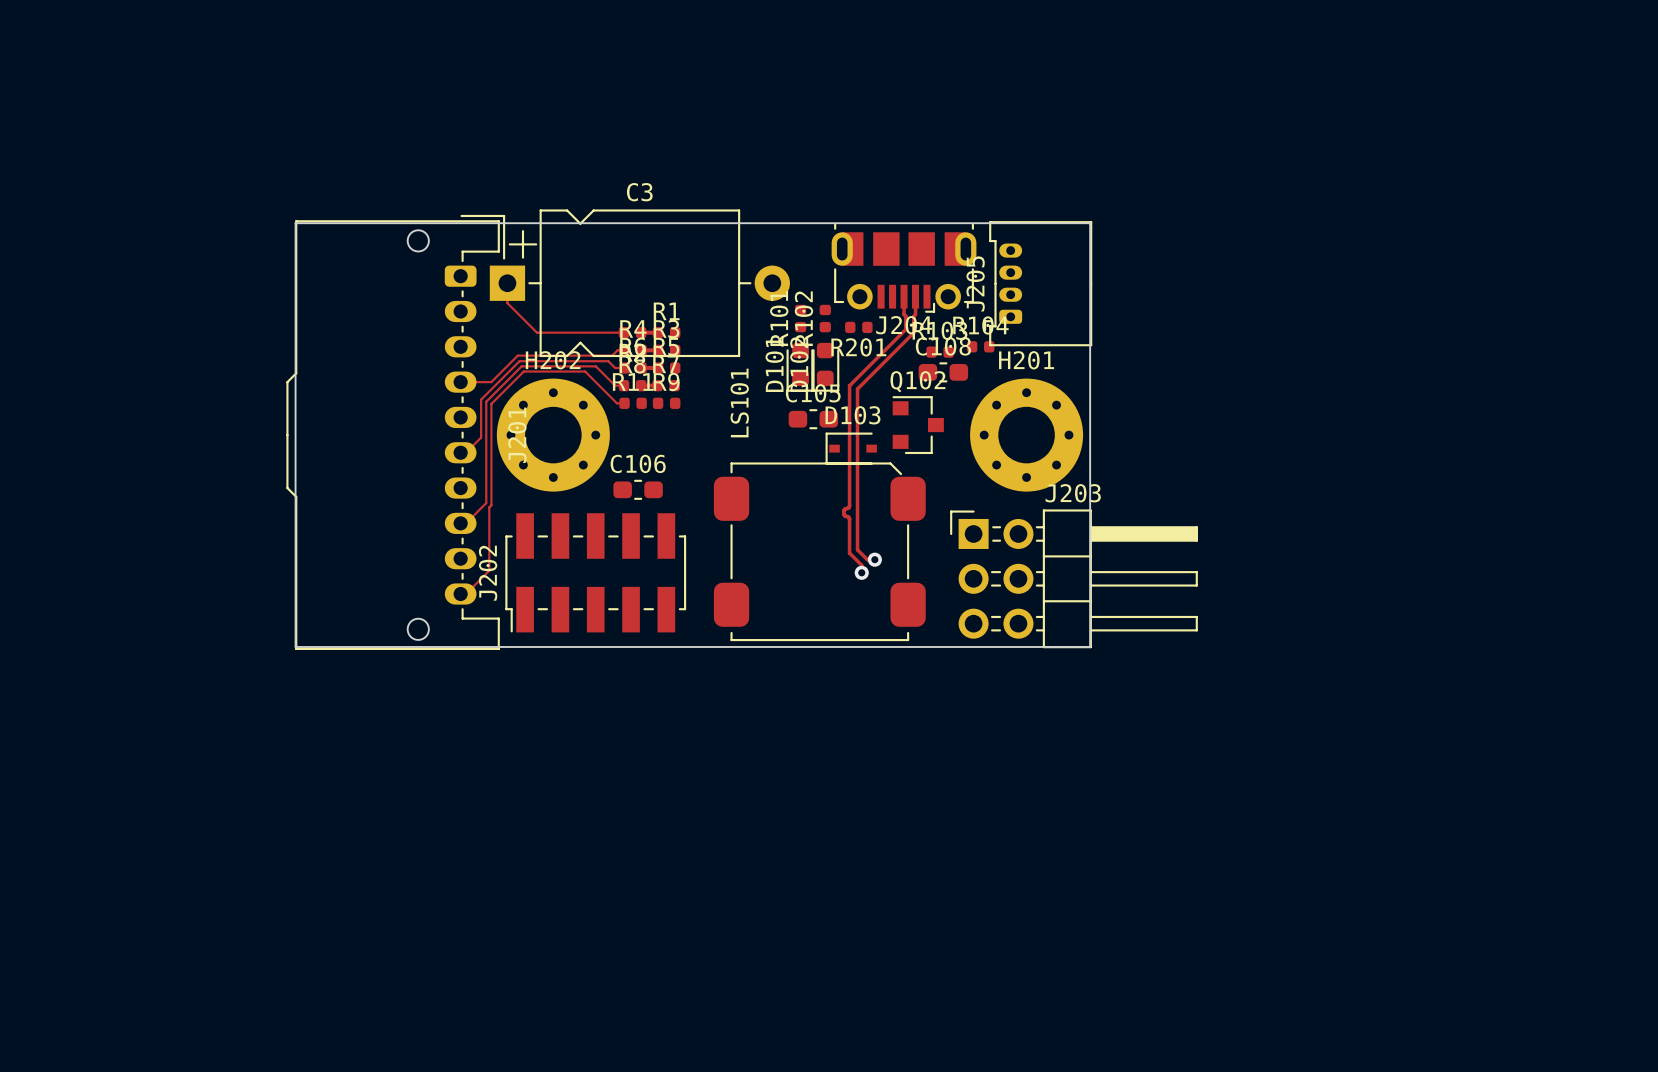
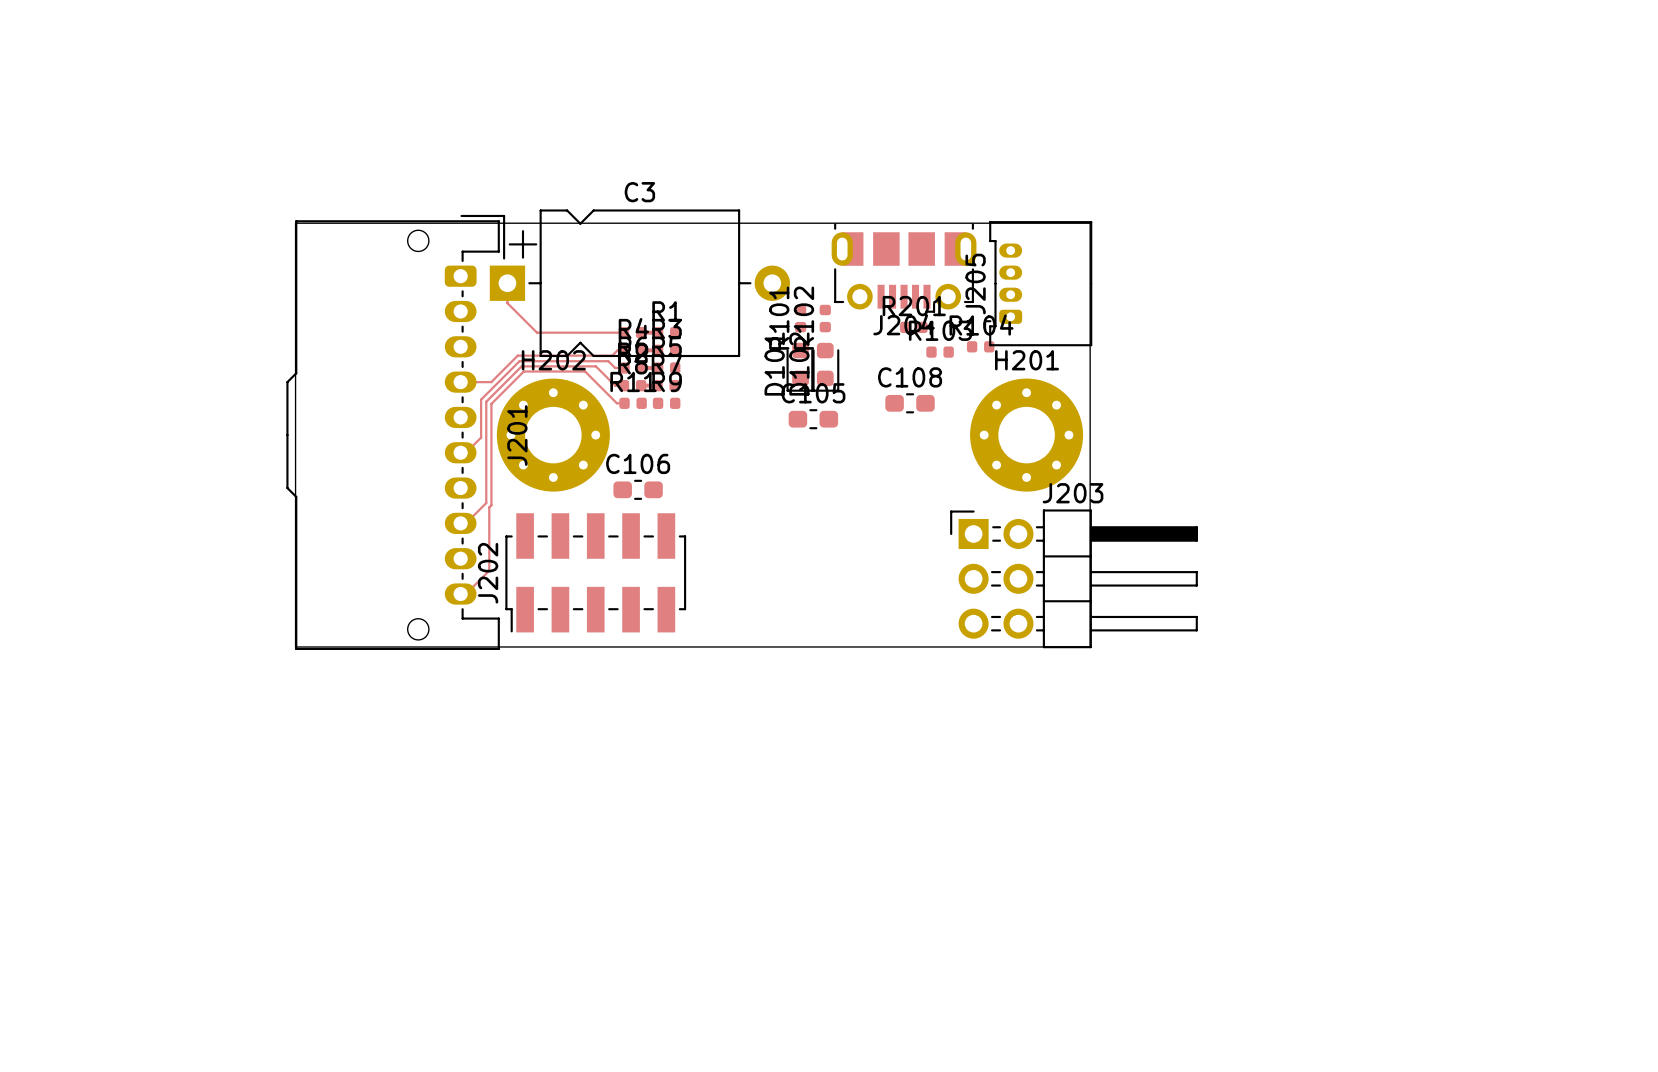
track: (904, 296) (905, 329) (849, 385) (849, 505) (844, 509) (843, 513) (849, 518) (849, 553) (861, 565) (861, 572) -> none
track: (915, 296) (913, 332) (857, 389) (857, 549) (867, 559) (874, 559) -> none
R201 position: (858, 327) -> (913, 327)
R201 name position: R201 (858, 347) -> R201 (914, 306)
C108 position: (943, 372) -> (910, 403)
Q102: (918, 425) -> none
D103: (851, 448) -> none
LS101: (819, 551) -> none
via: (874, 559) -> none
via: (861, 572) -> none

